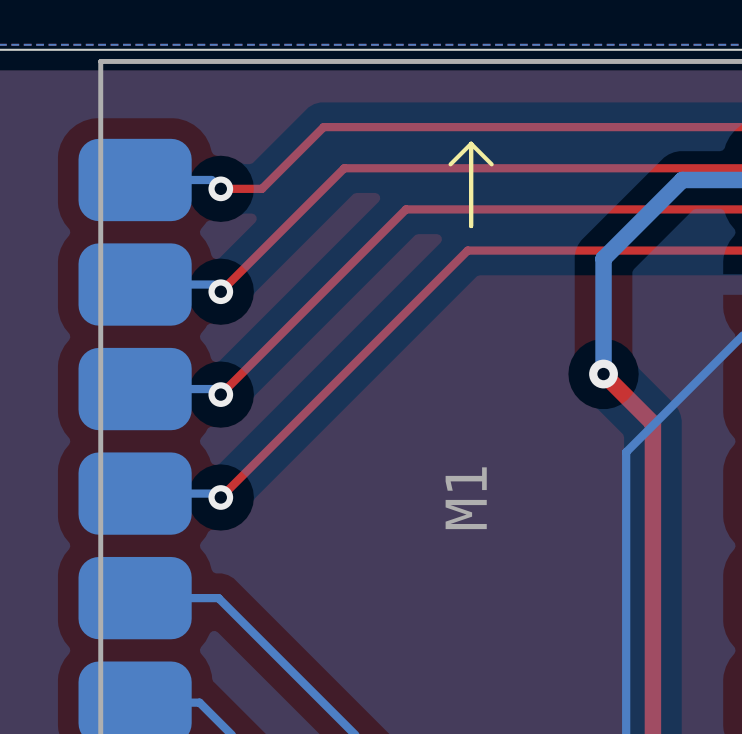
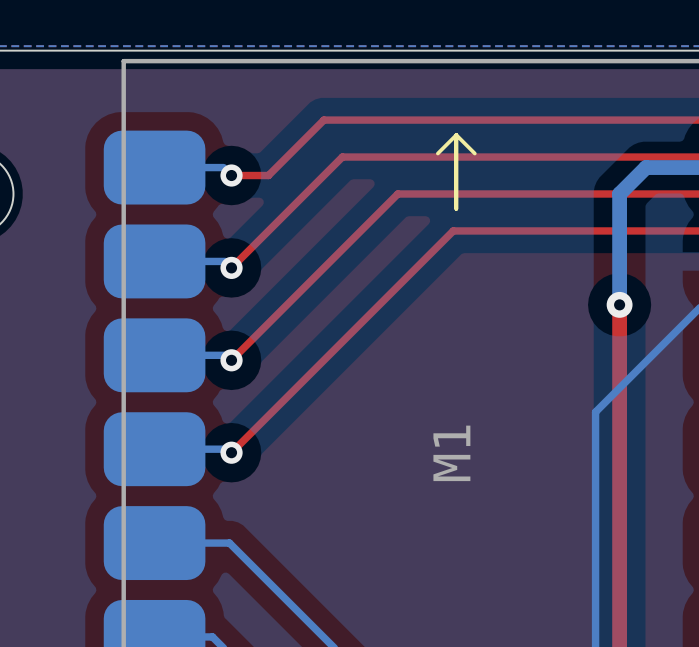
bottom track: (652, 209) (603, 258) (603, 374) -> (619, 193) (619, 304)
top track: (603, 374) (652, 423) -> (619, 304) (619, 386)
via position: (603, 374) -> (619, 304)

